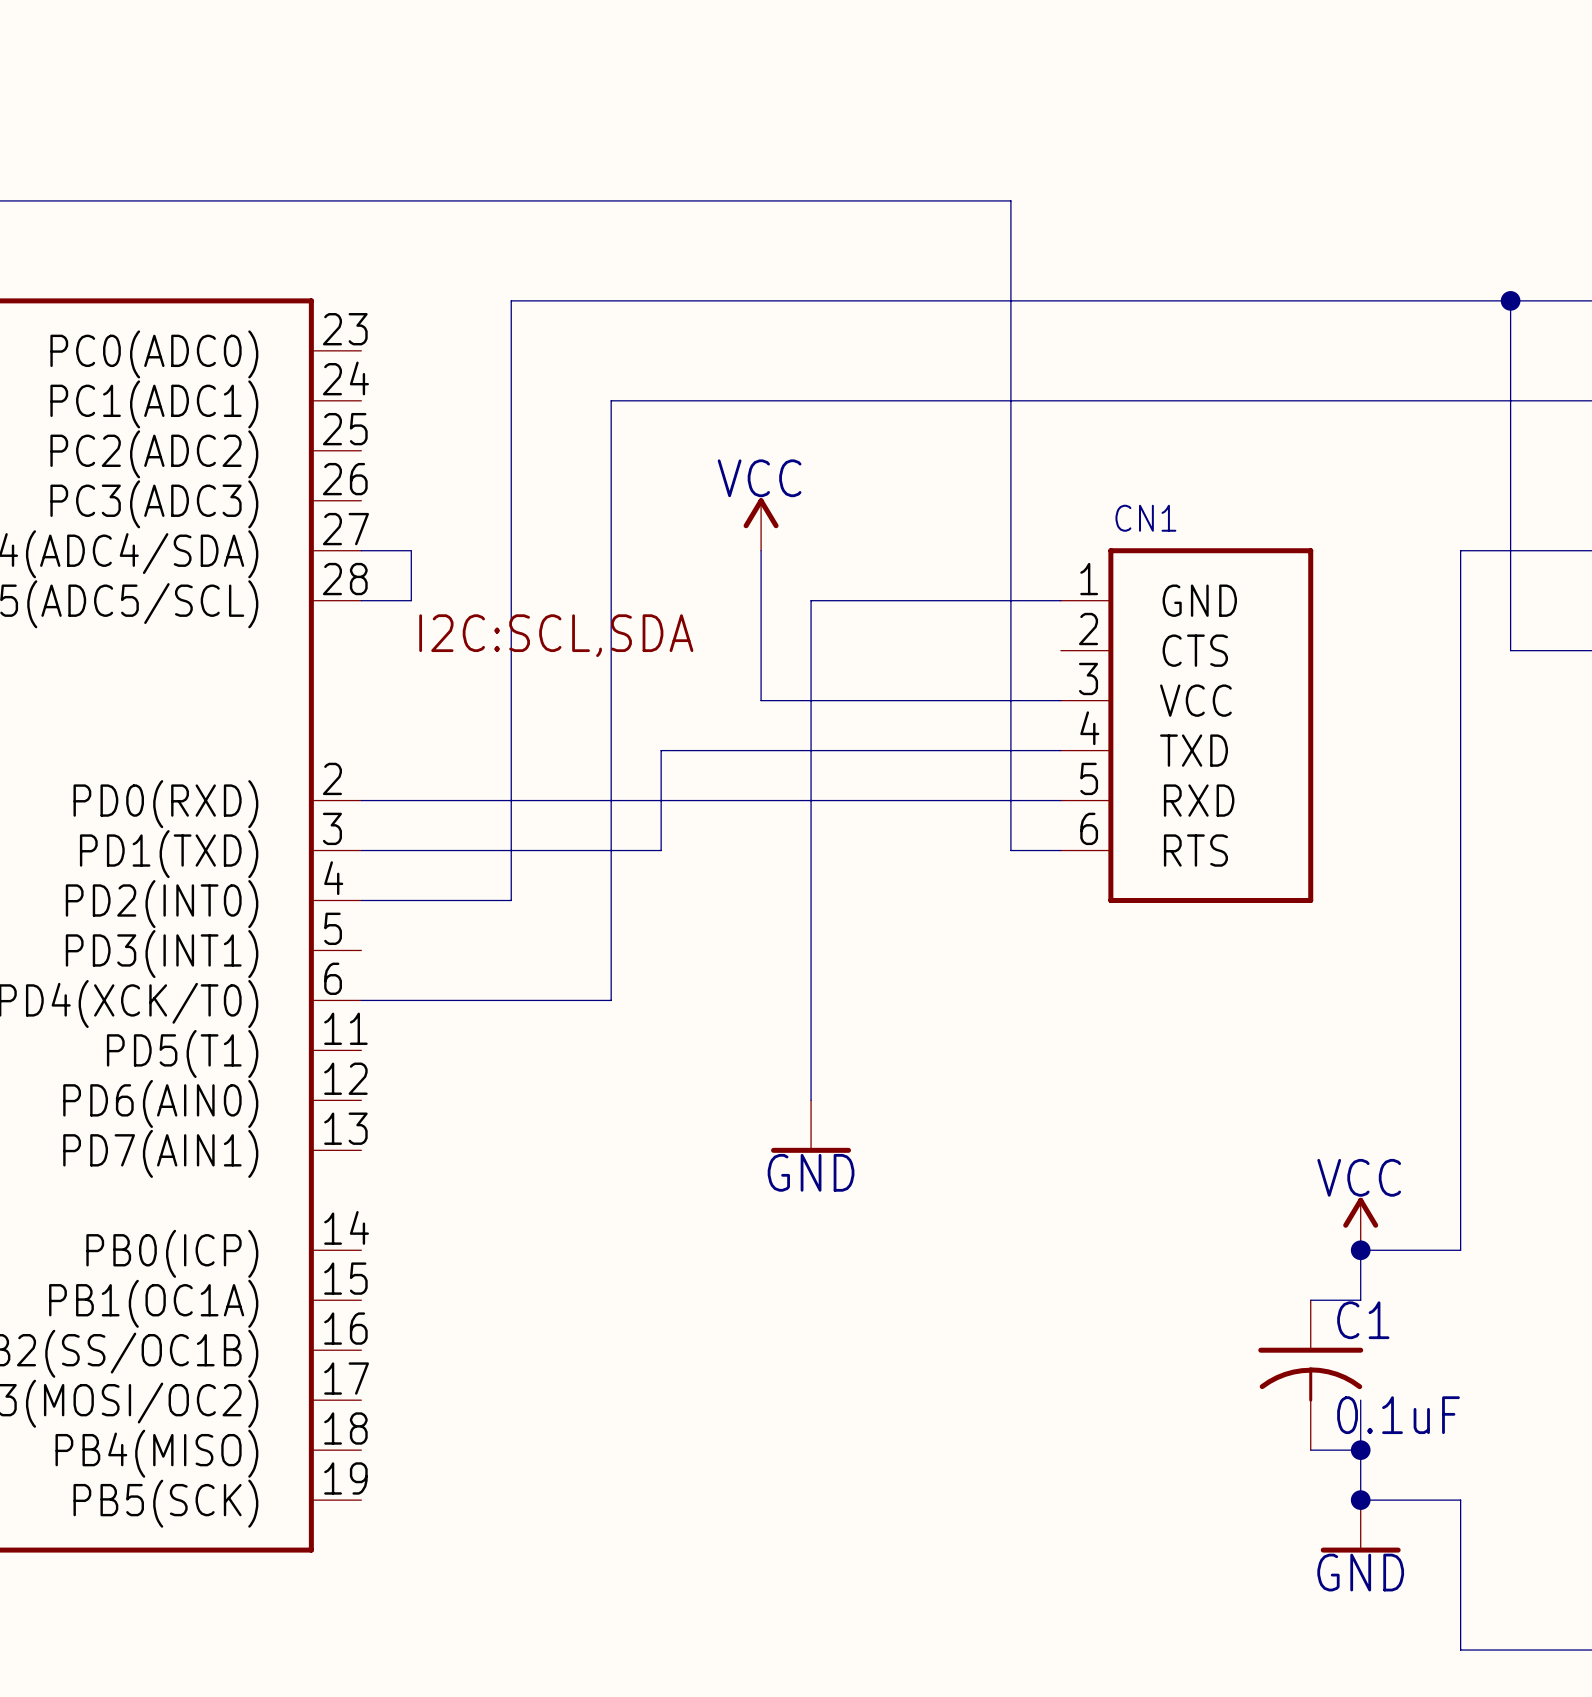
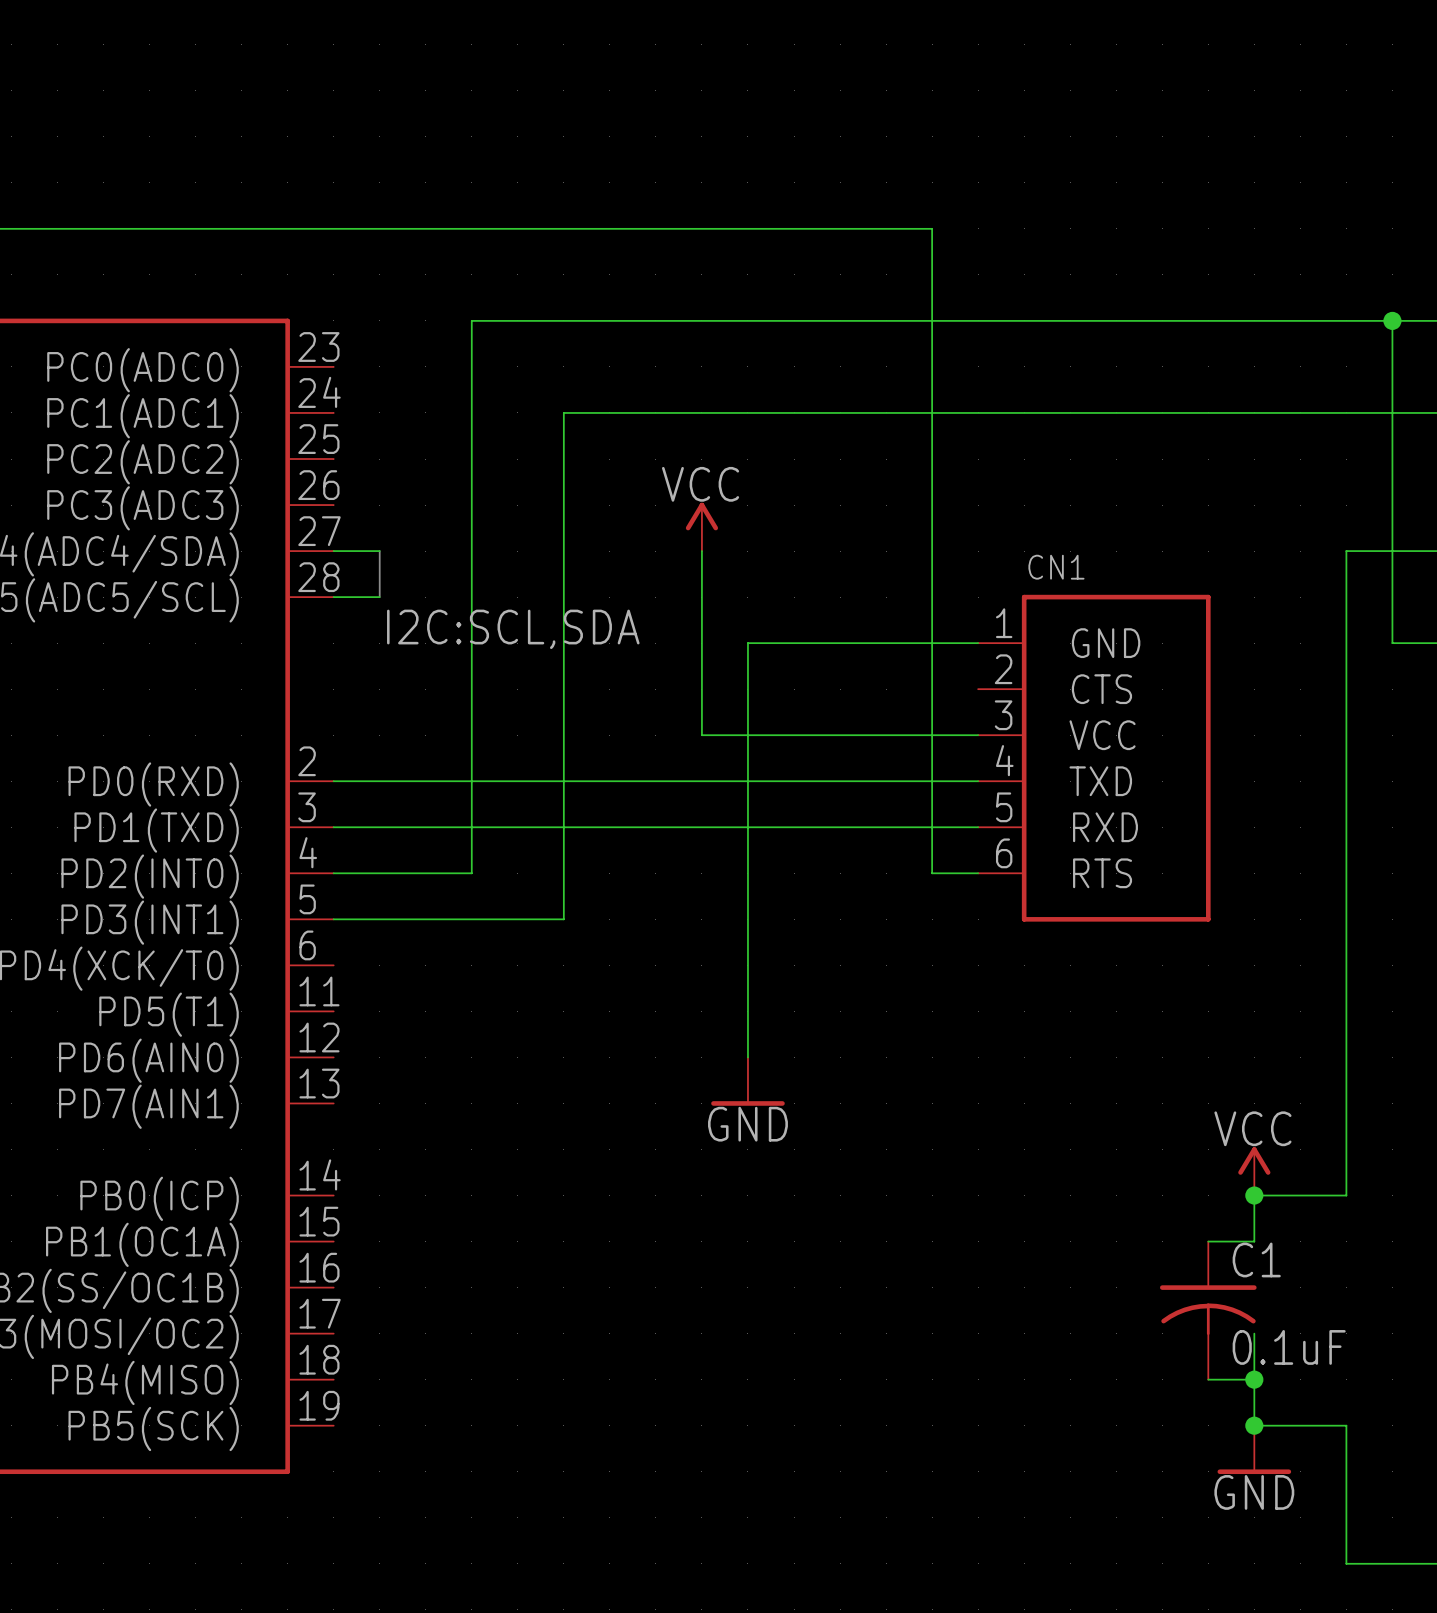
wire: (1060, 600) (811, 600) (811, 650) -> (978, 643) (747, 643)
wire: (761, 700) (1060, 700) -> none
CN1 position: (1187, 725) -> (1094, 758)
wire: (761, 750) (661, 750) (661, 850) -> (701, 735) (701, 689)
wire: none -> (609, 827) (932, 827) (932, 873) (978, 873)
wire: (611, 950) (611, 1000) (361, 1000) -> (563, 919) (333, 919)

